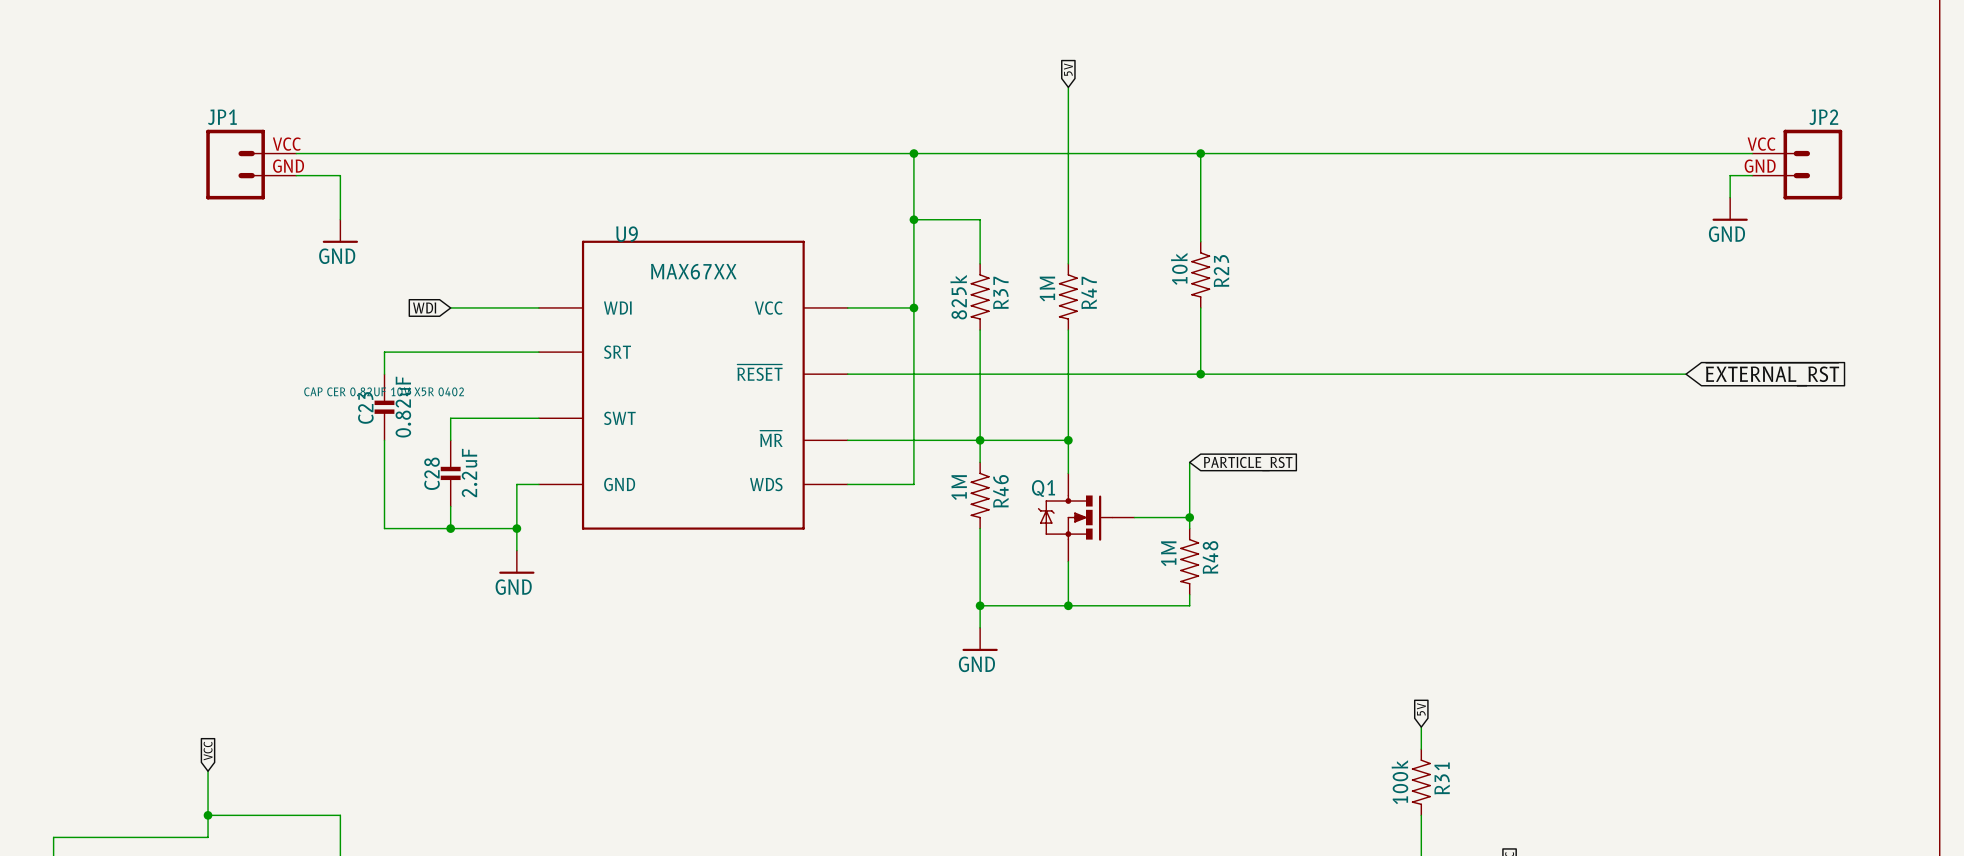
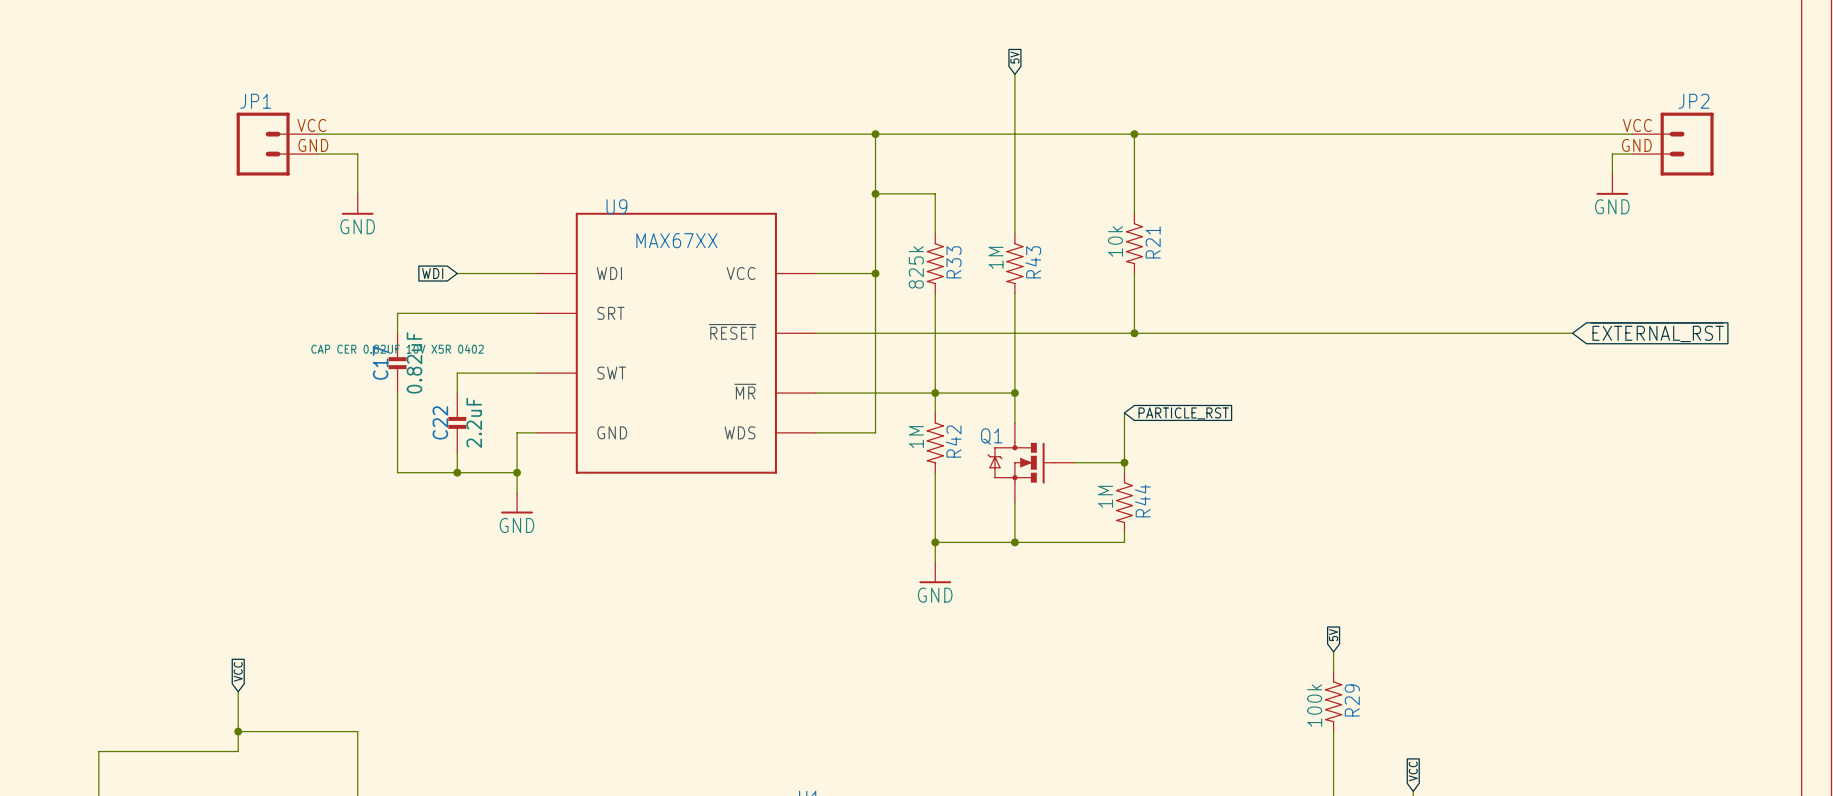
R23 name: R23 (1221, 271) -> R21 (1153, 242)
R37 name: R37 (1000, 292) -> R33 (953, 262)
R47 name: R47 (1089, 292) -> R43 (1033, 262)
C23 name: C23 (365, 407) -> C17 (380, 362)
C28 name: C28 (432, 473) -> C22 (440, 422)
R46 name: R46 (1000, 491) -> R42 (953, 441)
R48 name: R48 (1210, 557) -> R44 (1142, 501)
R31 name: R31 (1442, 778) -> R29 (1352, 700)

